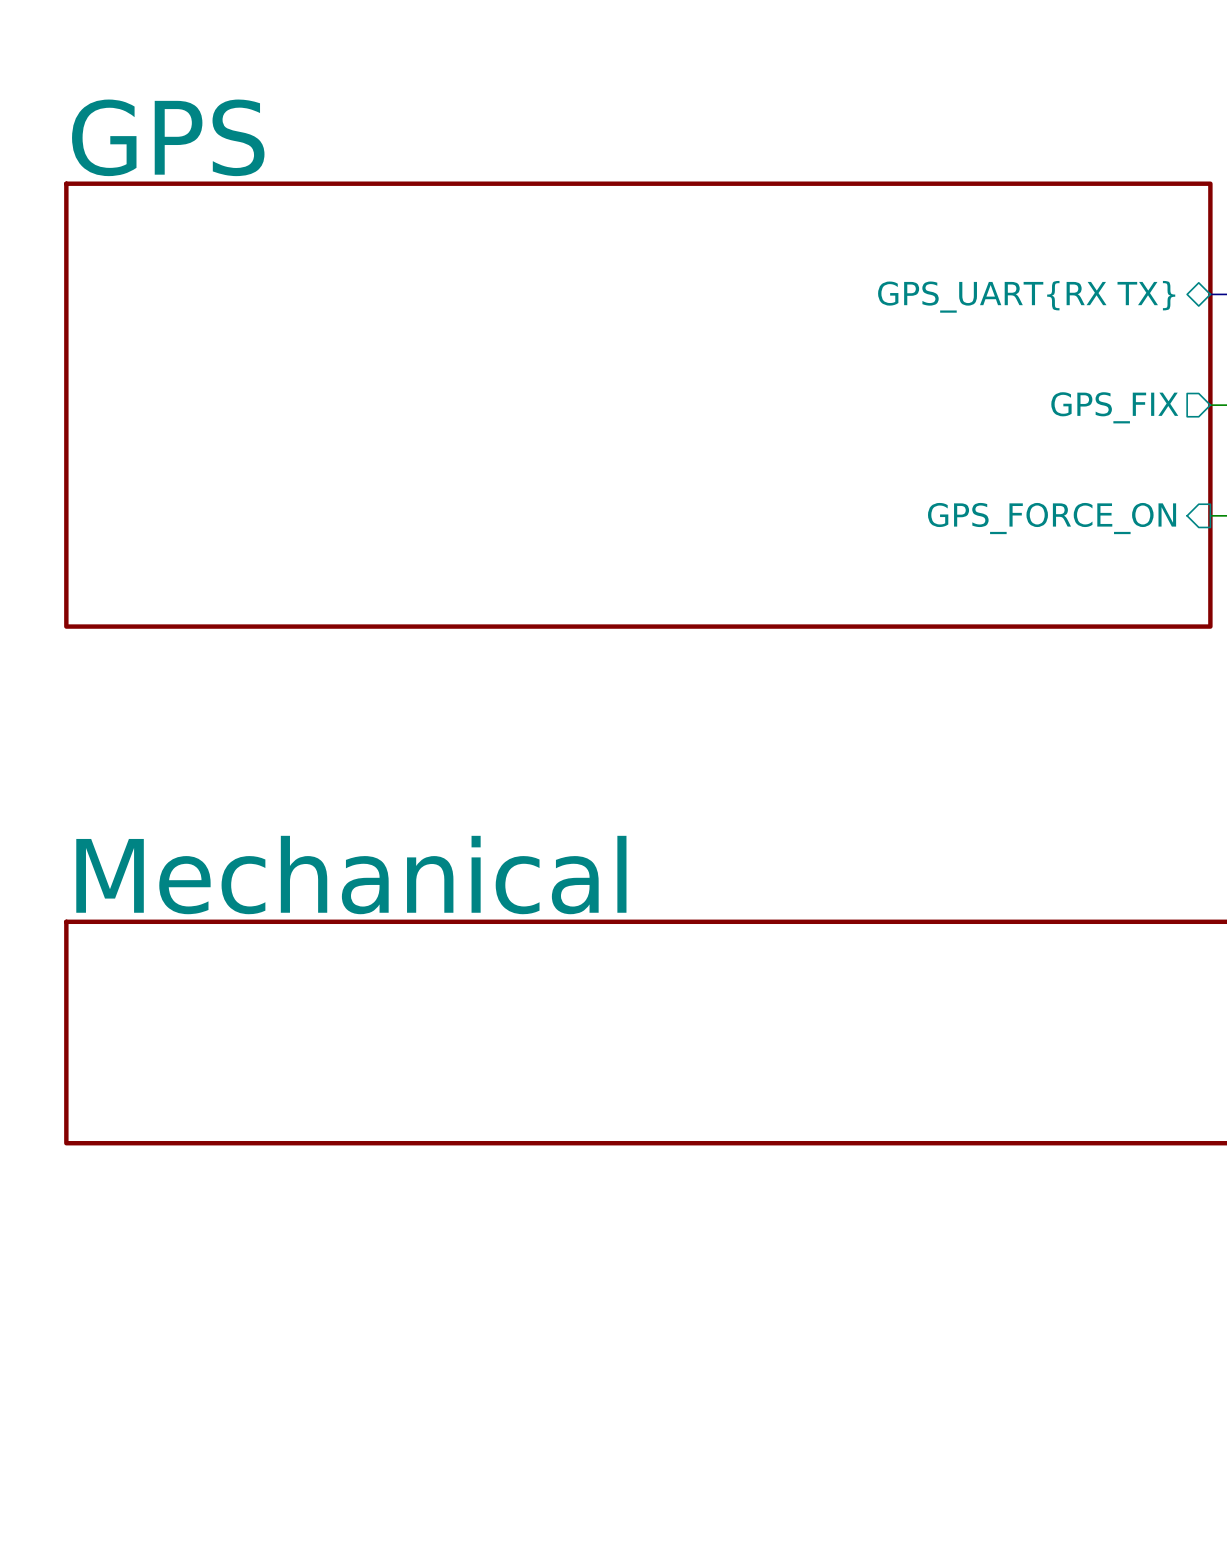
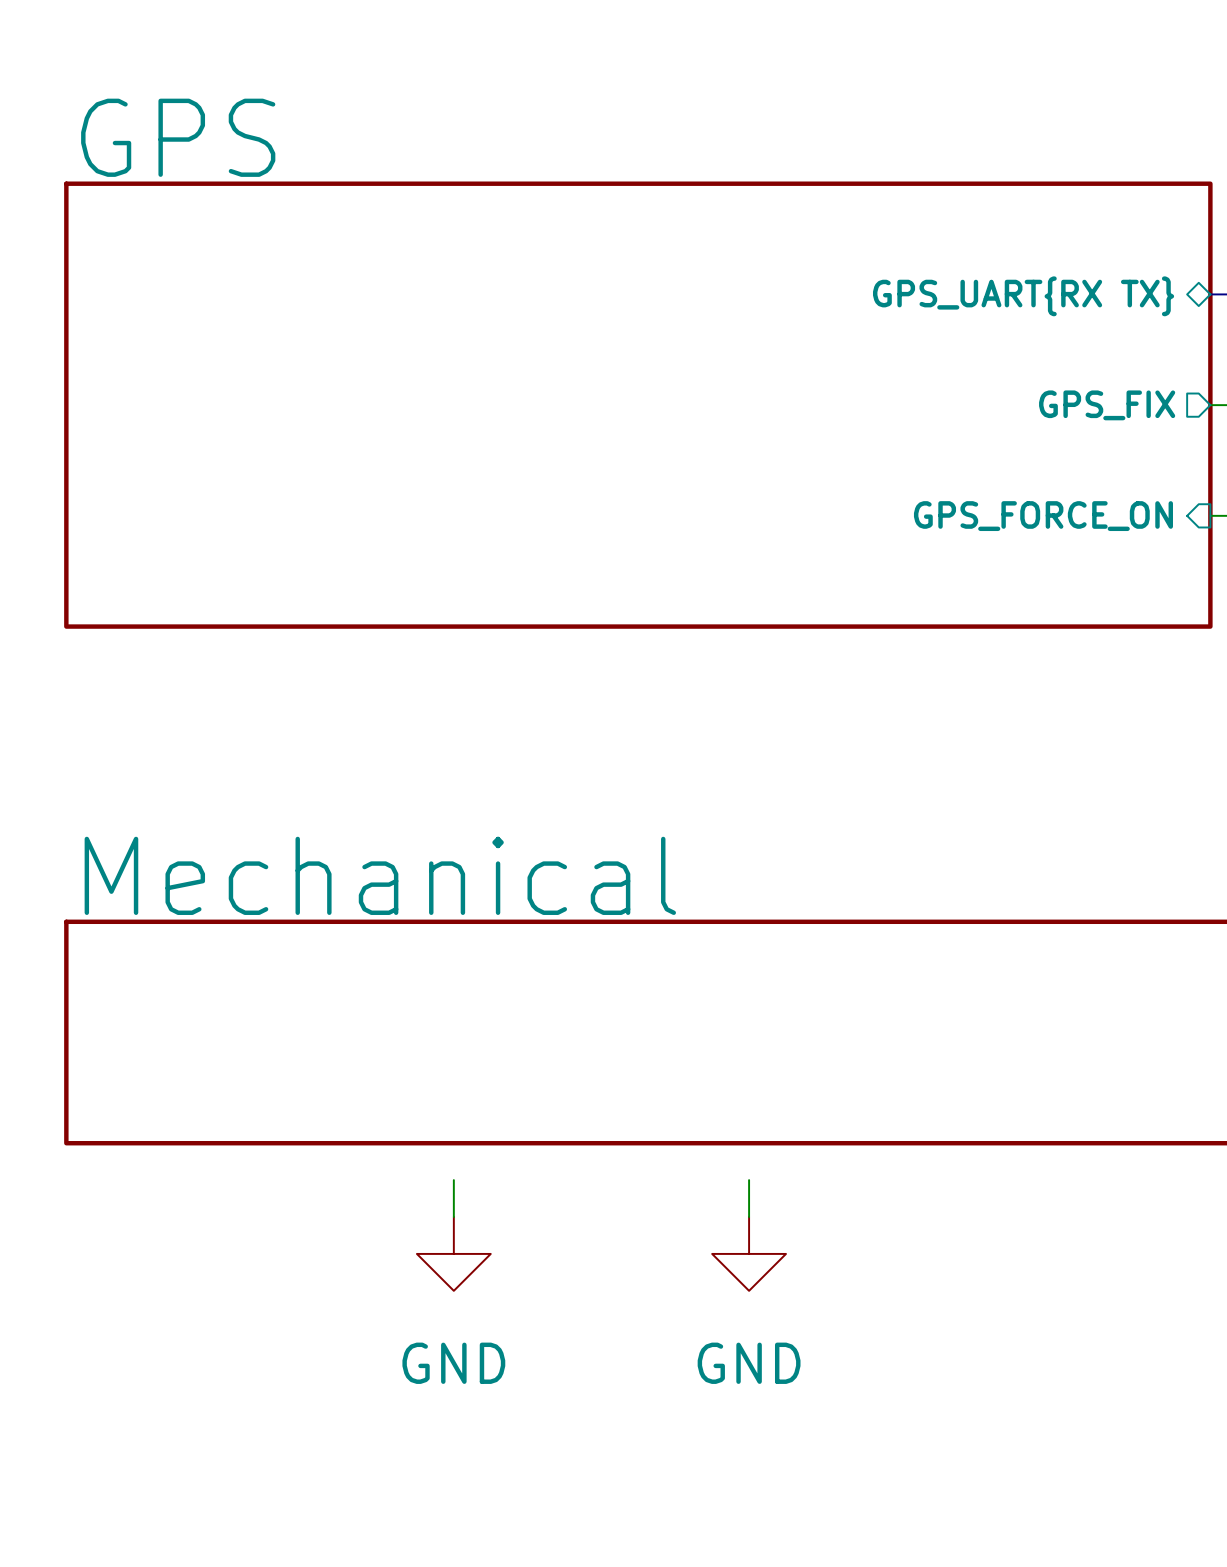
wire: none -> (453, 1180) (453, 1217)
wire: none -> (749, 1180) (749, 1217)
power symbol: none -> GND (453, 1253)
power symbol: none -> GND (749, 1253)

